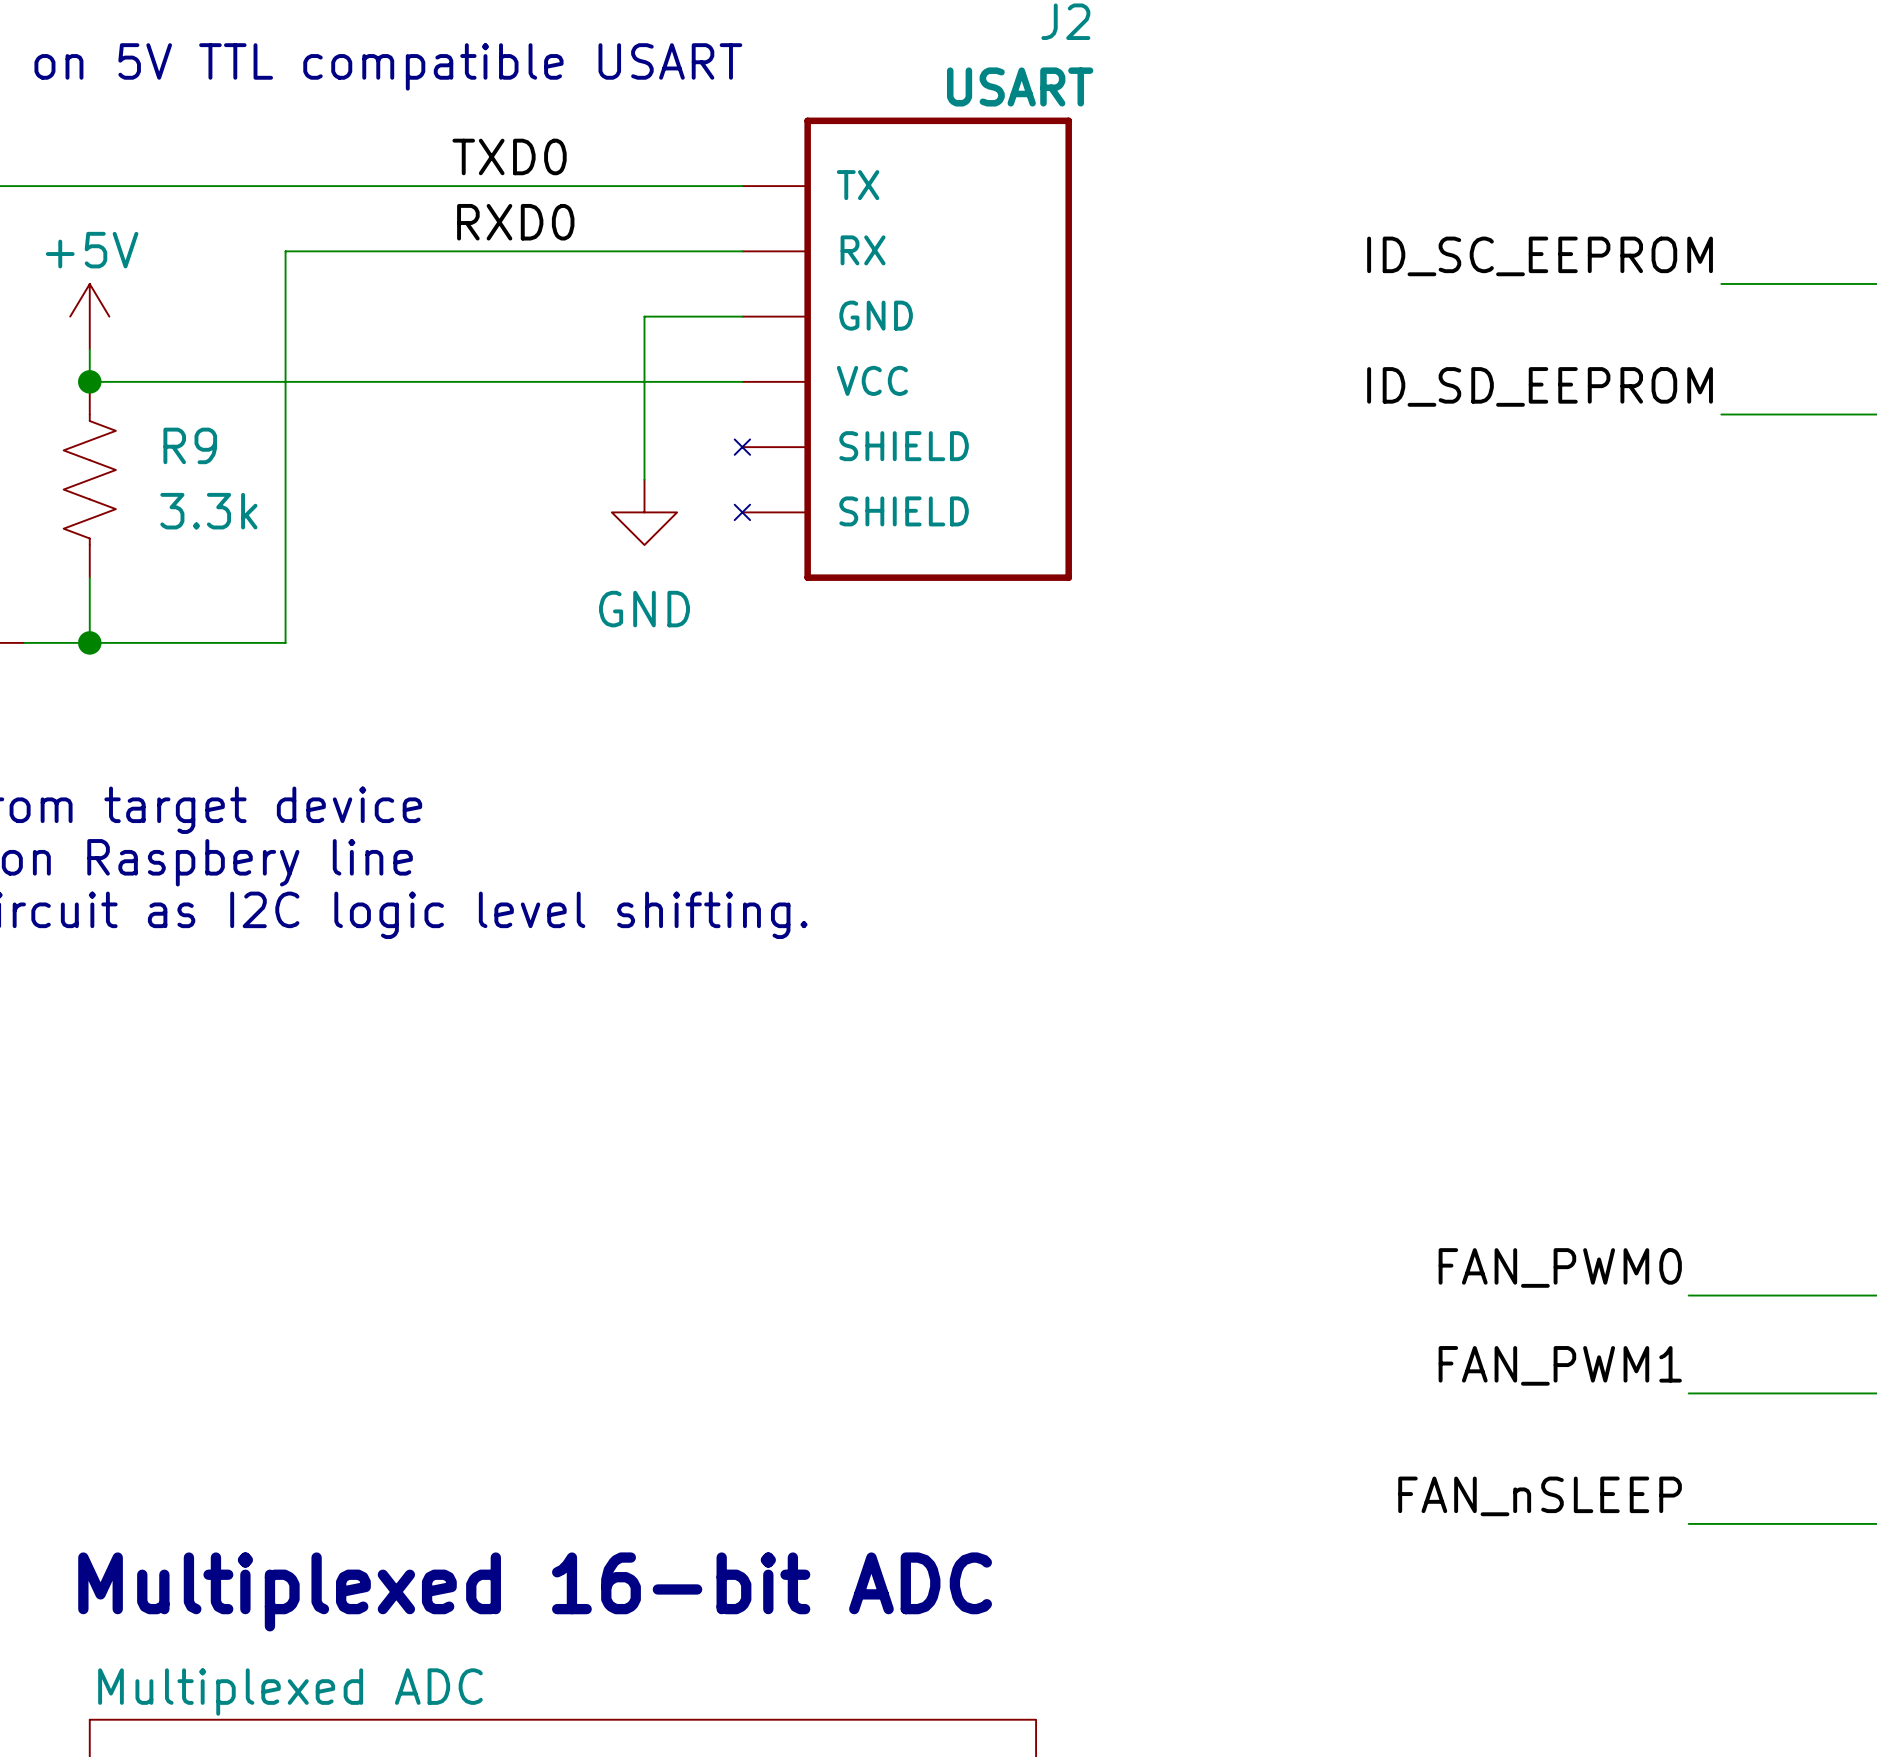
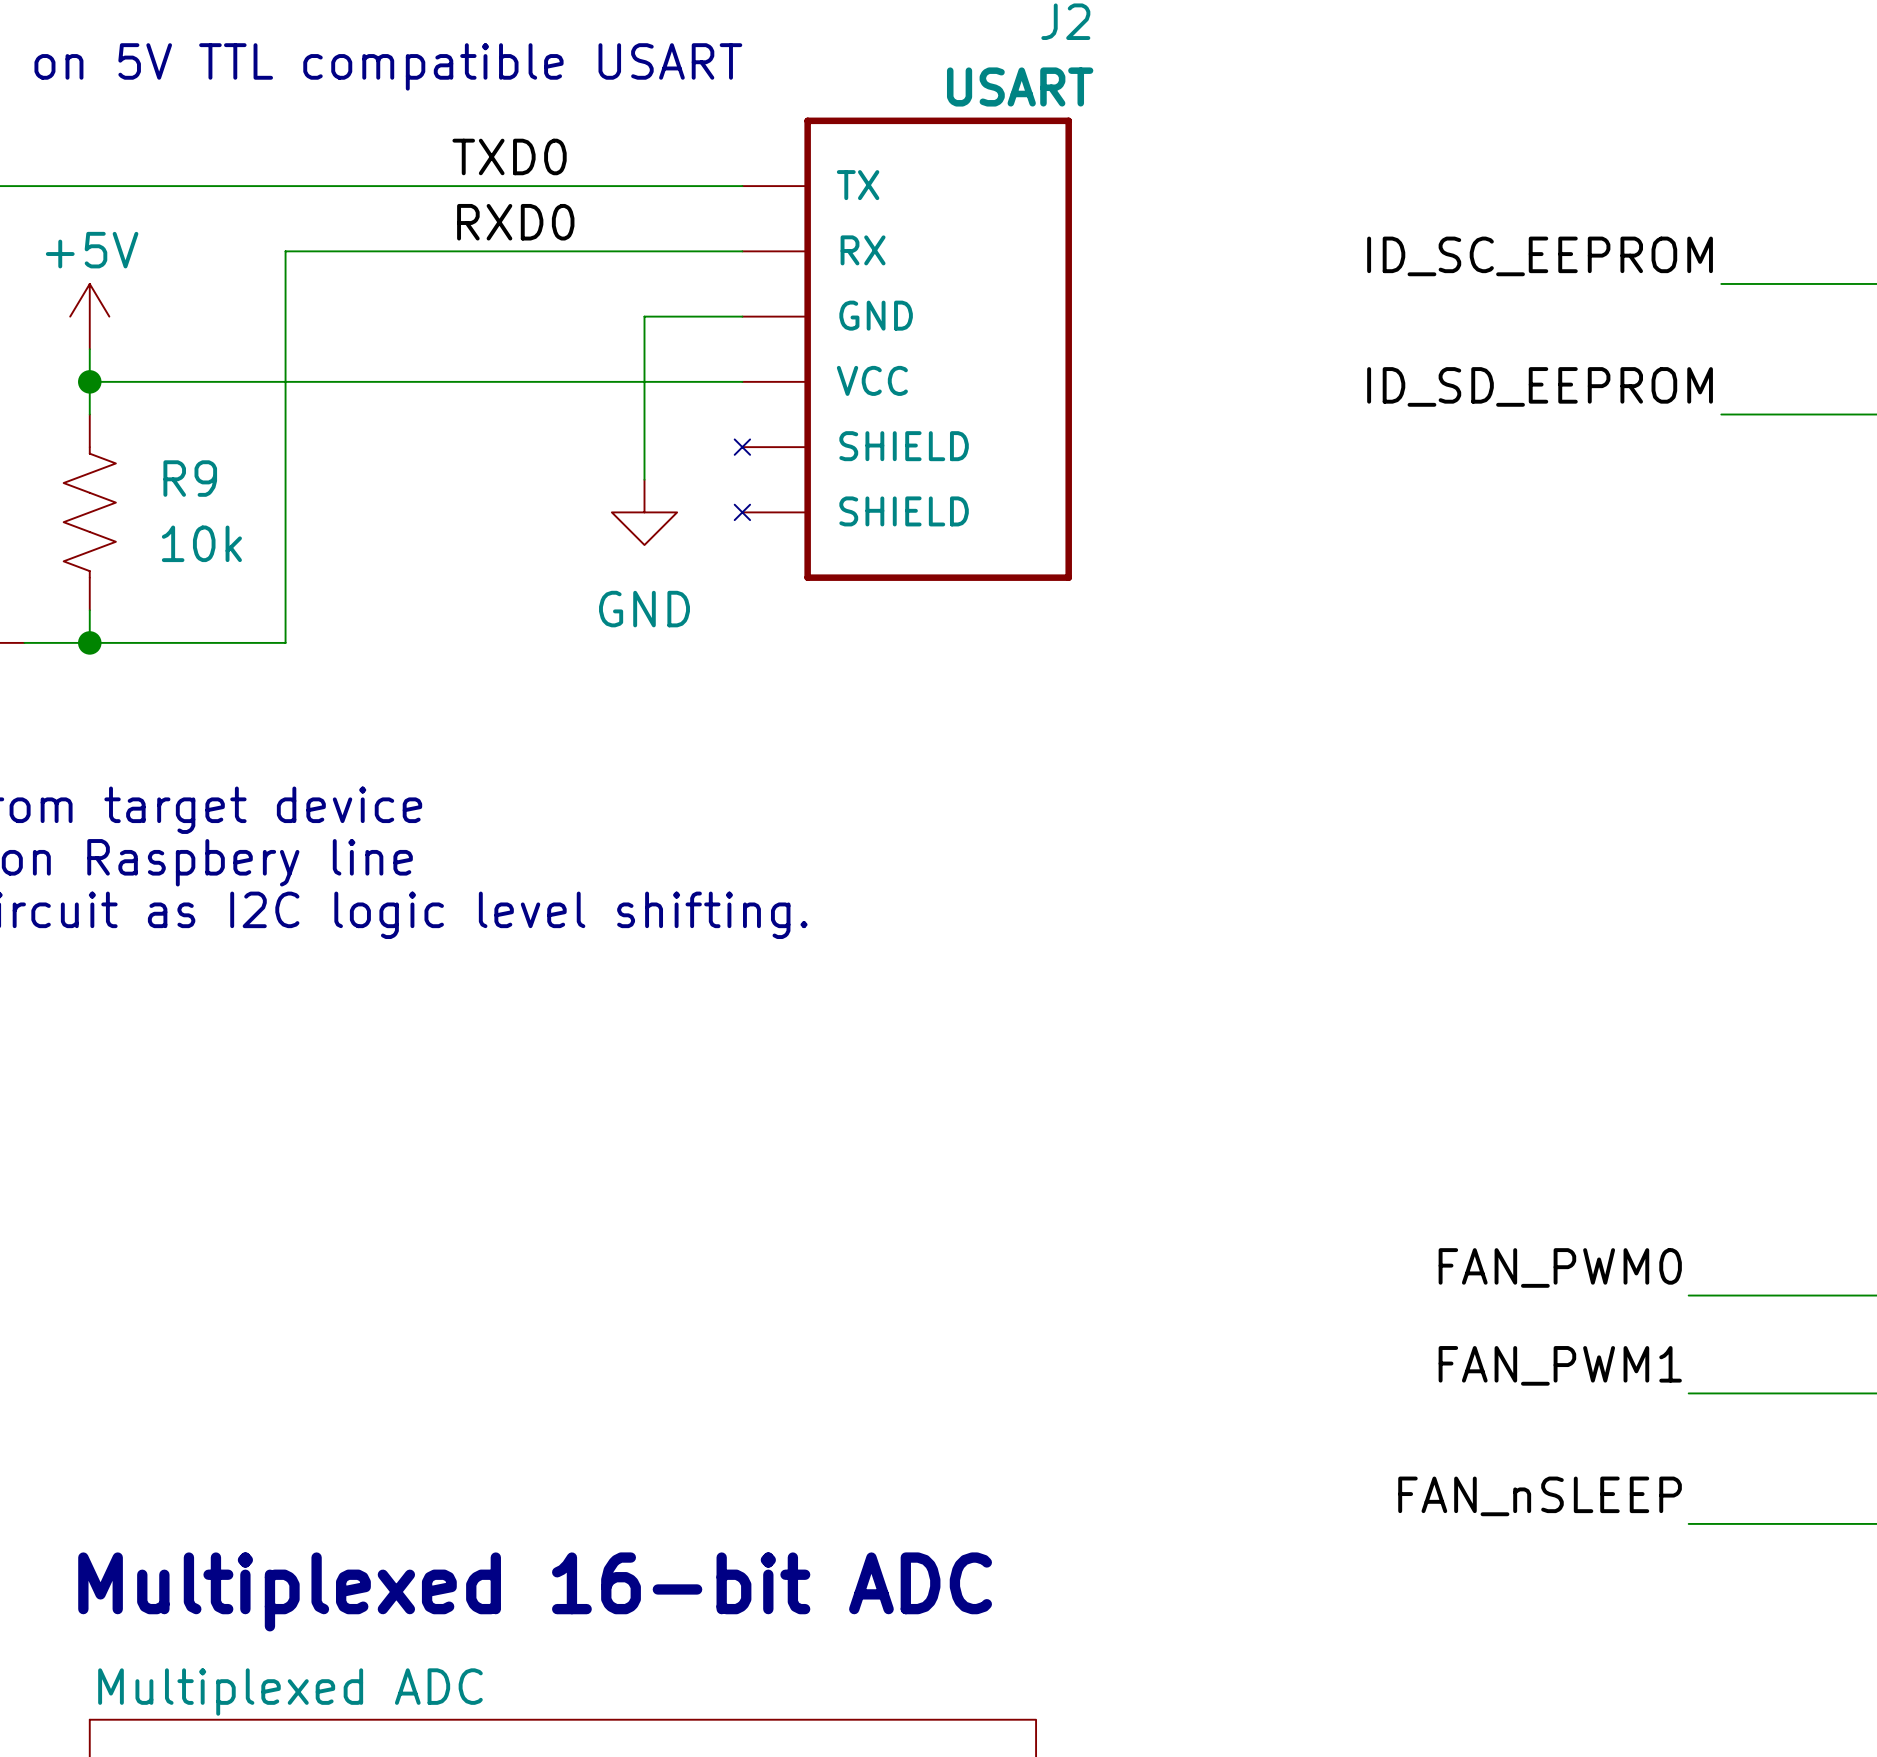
R9 position: (89, 479) -> (89, 512)
R9 value: 3.3k (208, 511) -> 10k (201, 543)

